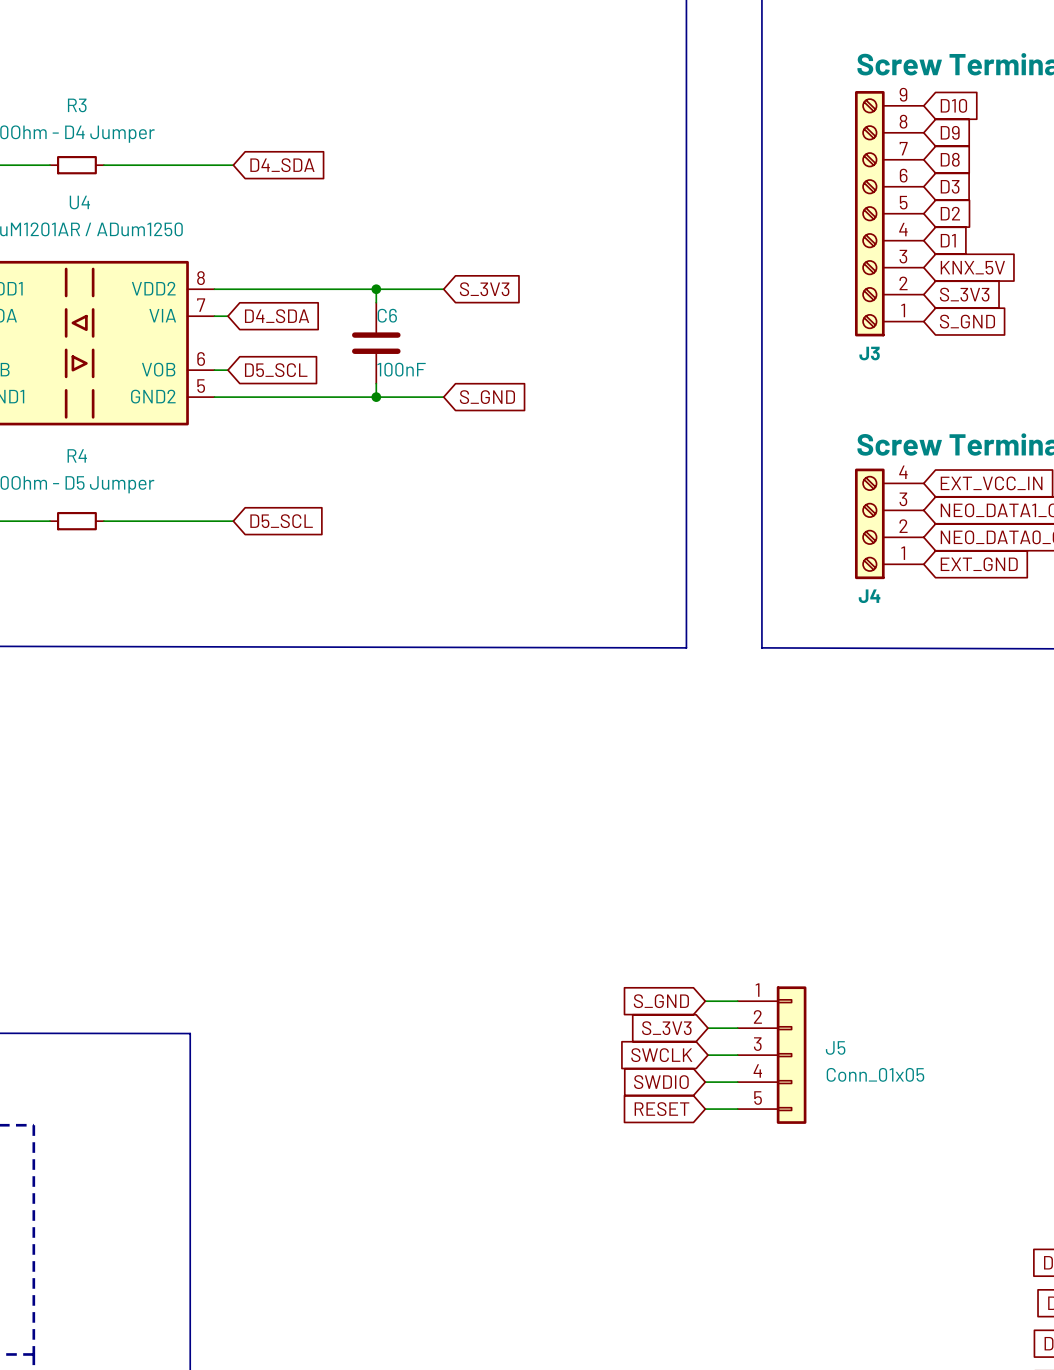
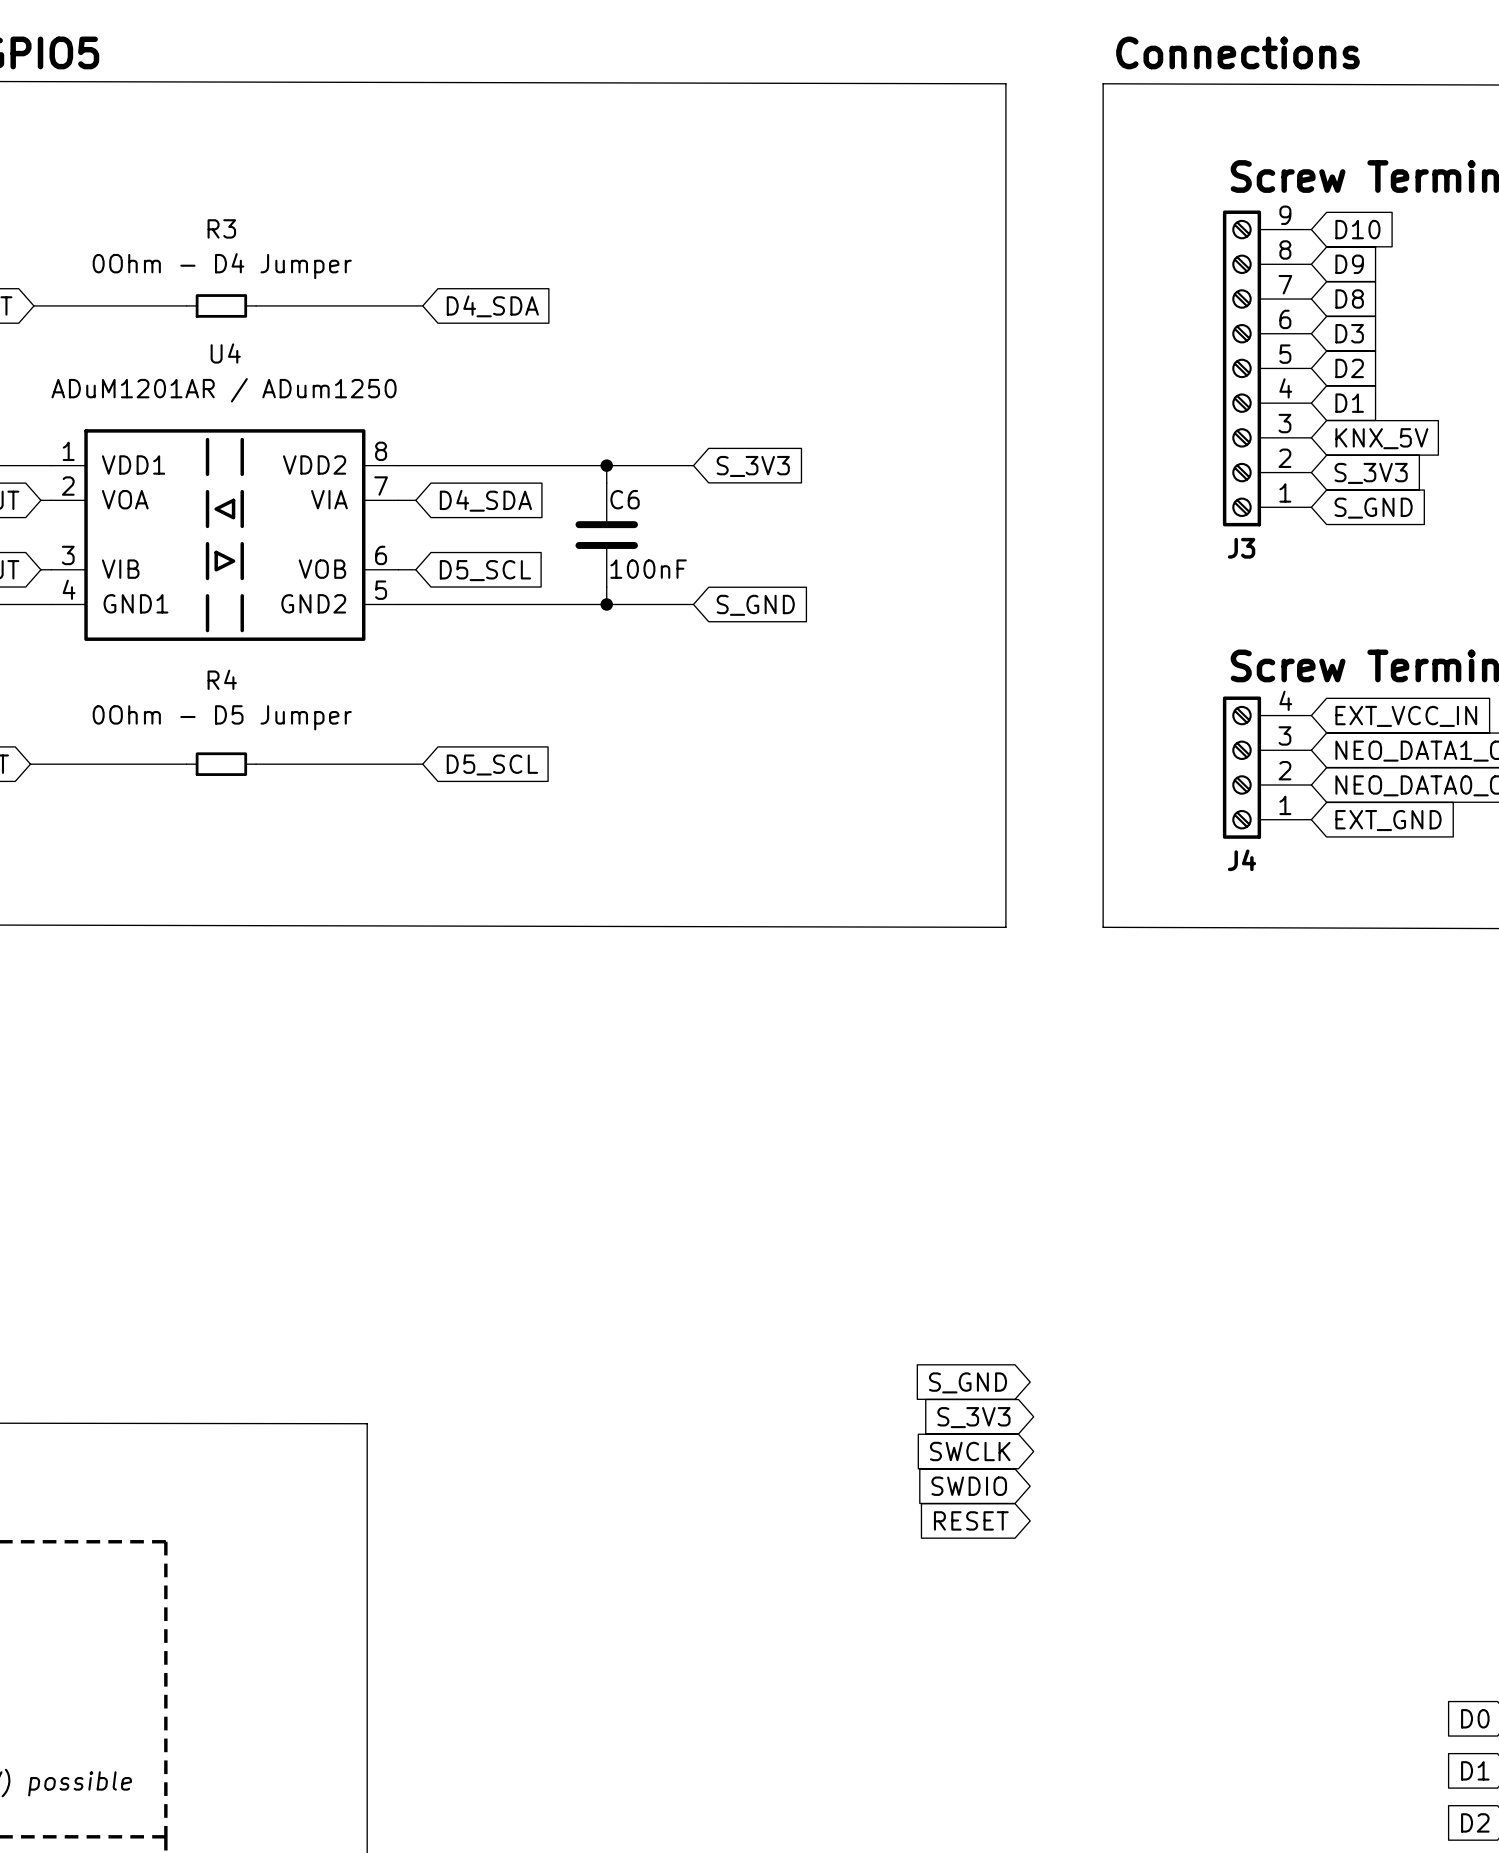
wire: (705, 1001) (737, 1001) -> none
wire: (708, 1028) (737, 1028) -> none
wire: (708, 1055) (737, 1055) -> none
J5: Conn_01x05 (772, 1055) -> none
wire: (705, 1082) (737, 1082) -> none
wire: (705, 1109) (737, 1109) -> none

